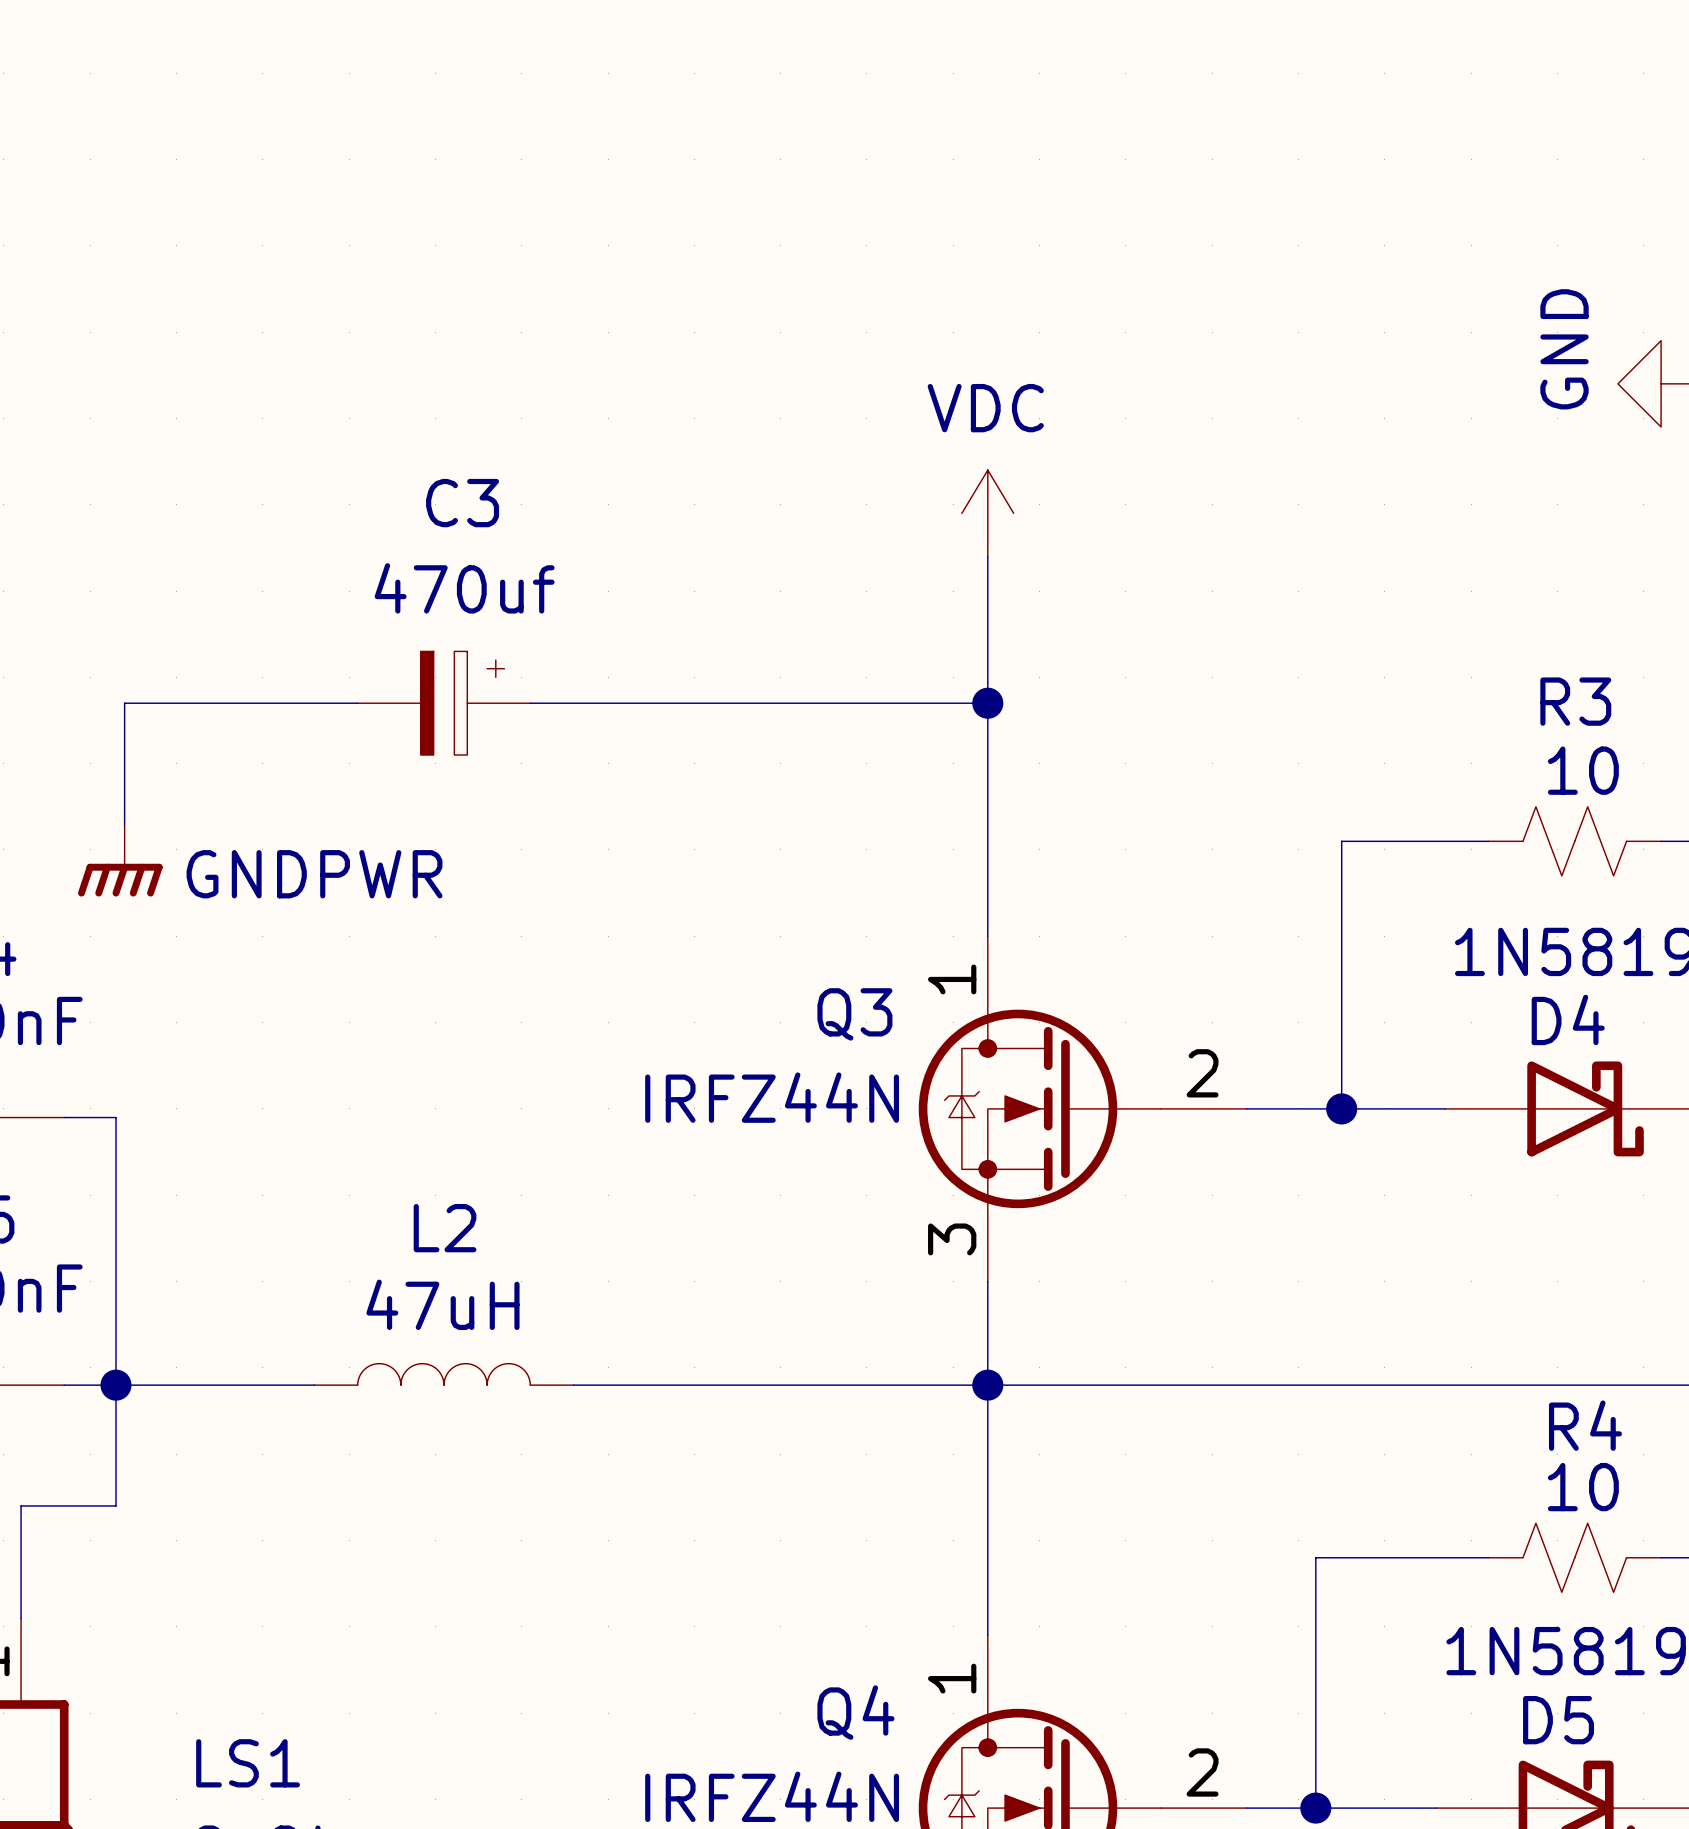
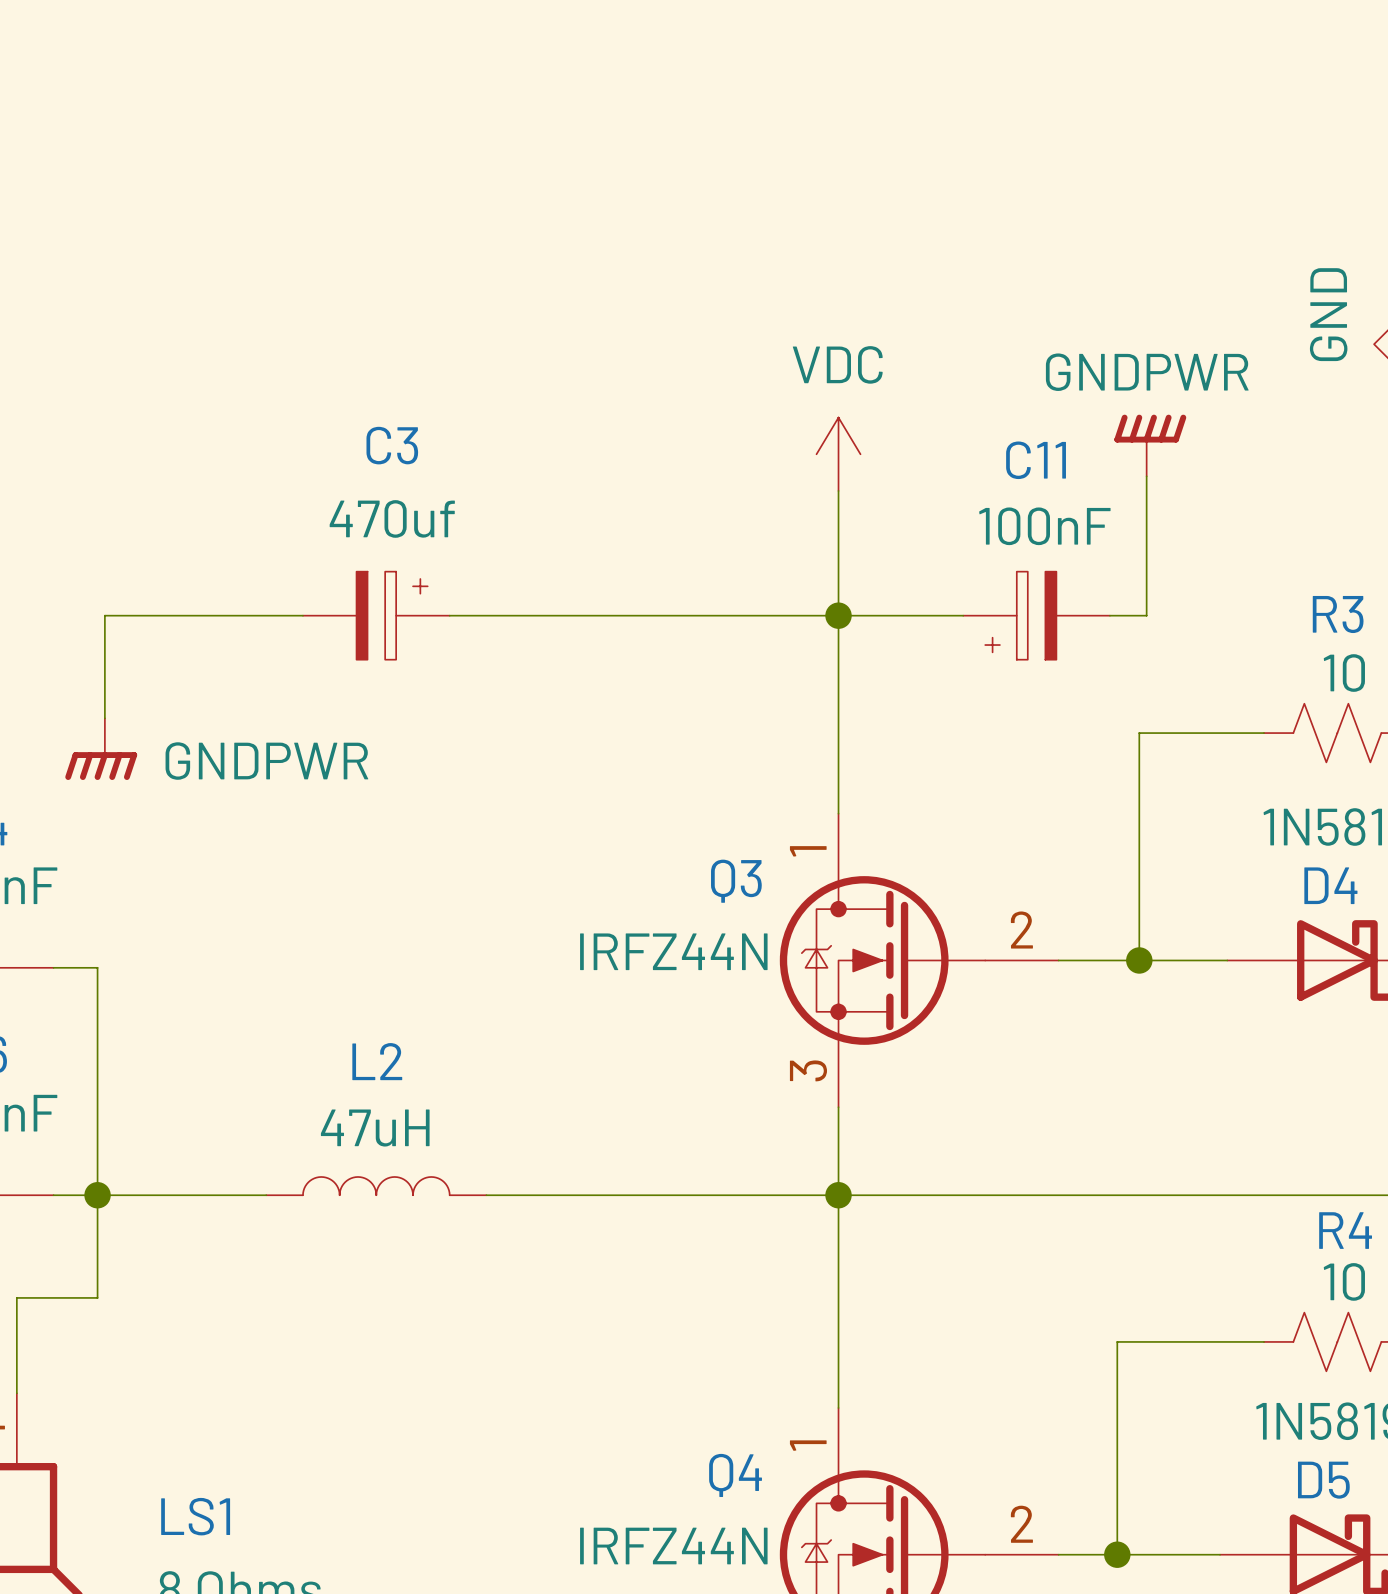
power symbol: none -> GNDPWR (1150, 445)
wire: none -> (1146, 476) (1146, 615) (1109, 615)
wire: none -> (838, 615) (963, 615)
C11: none -> 100nF (1036, 615)

